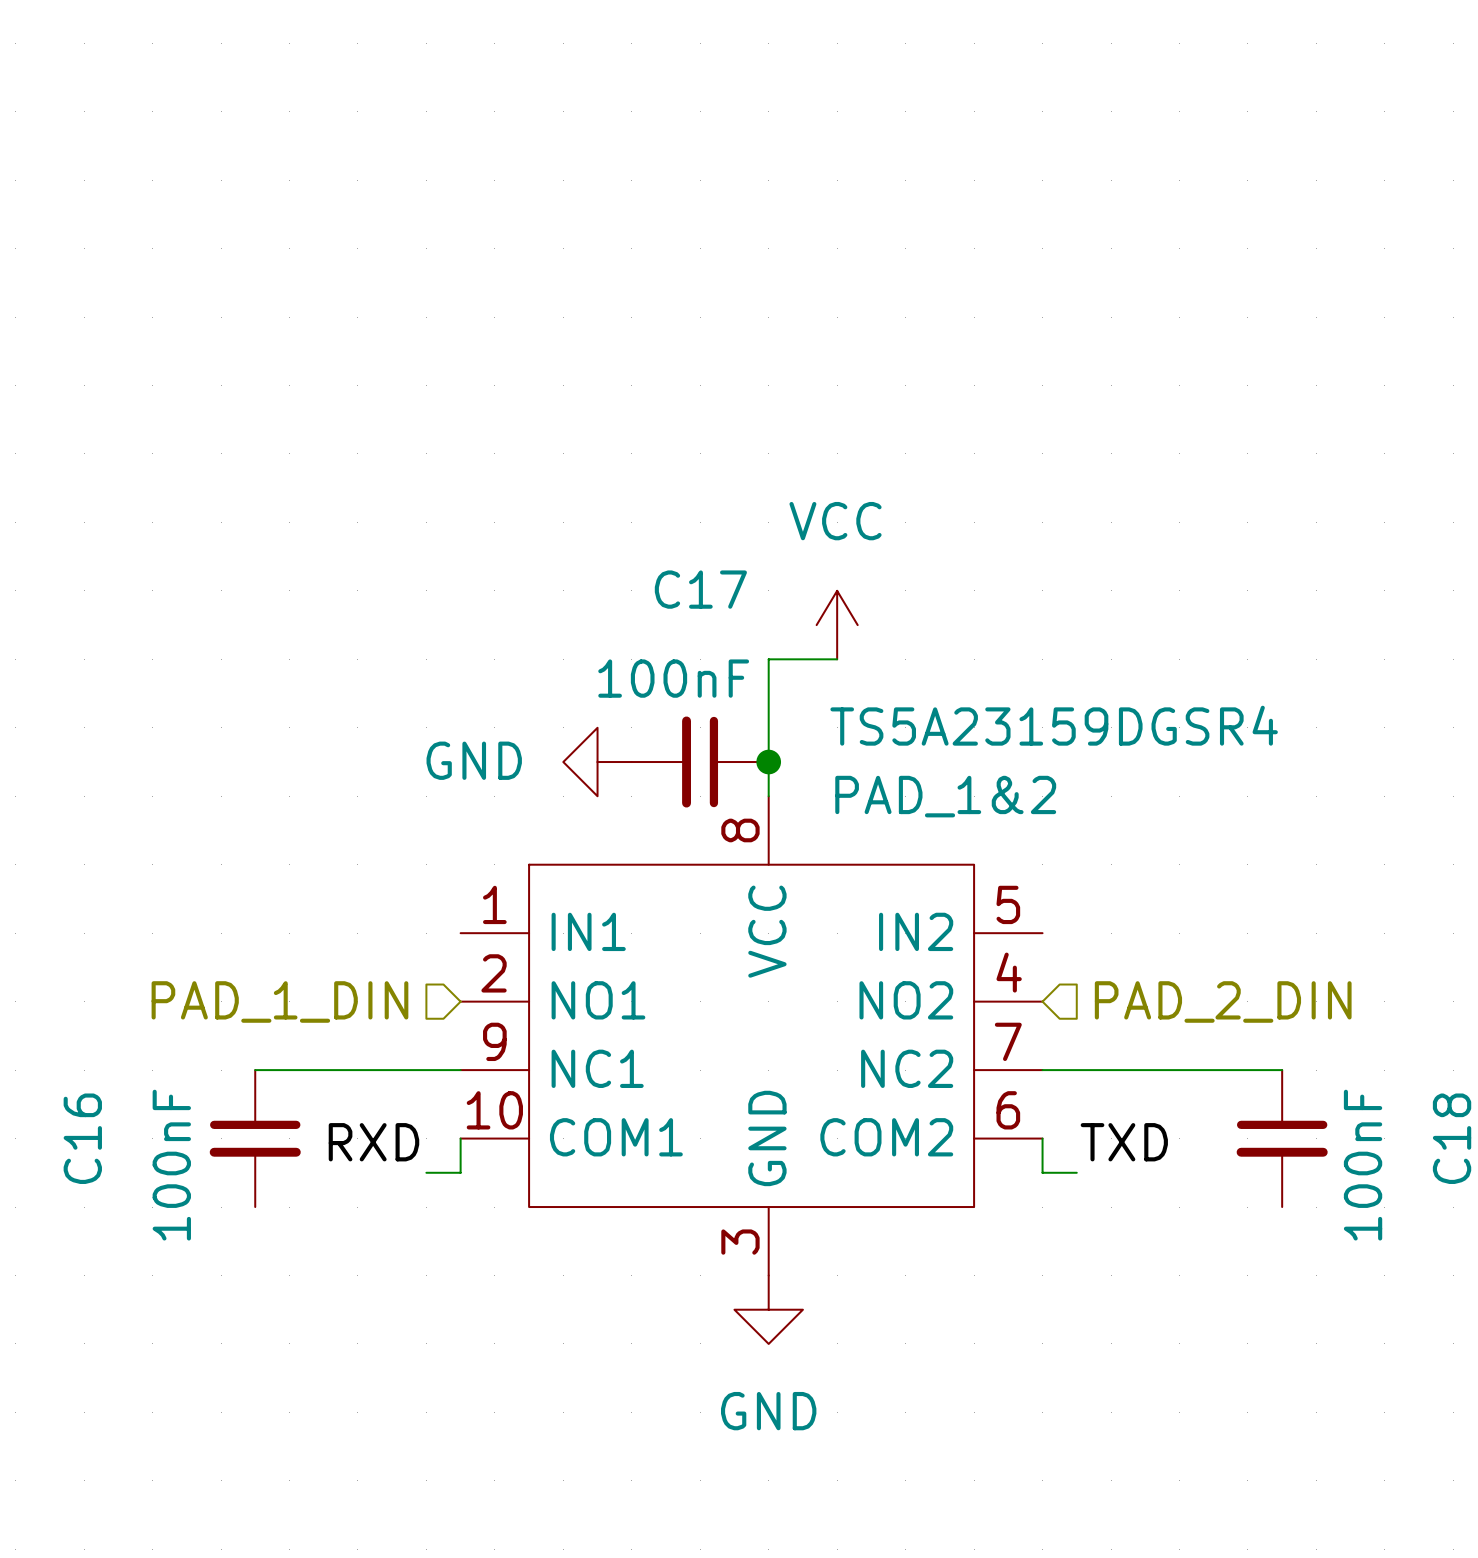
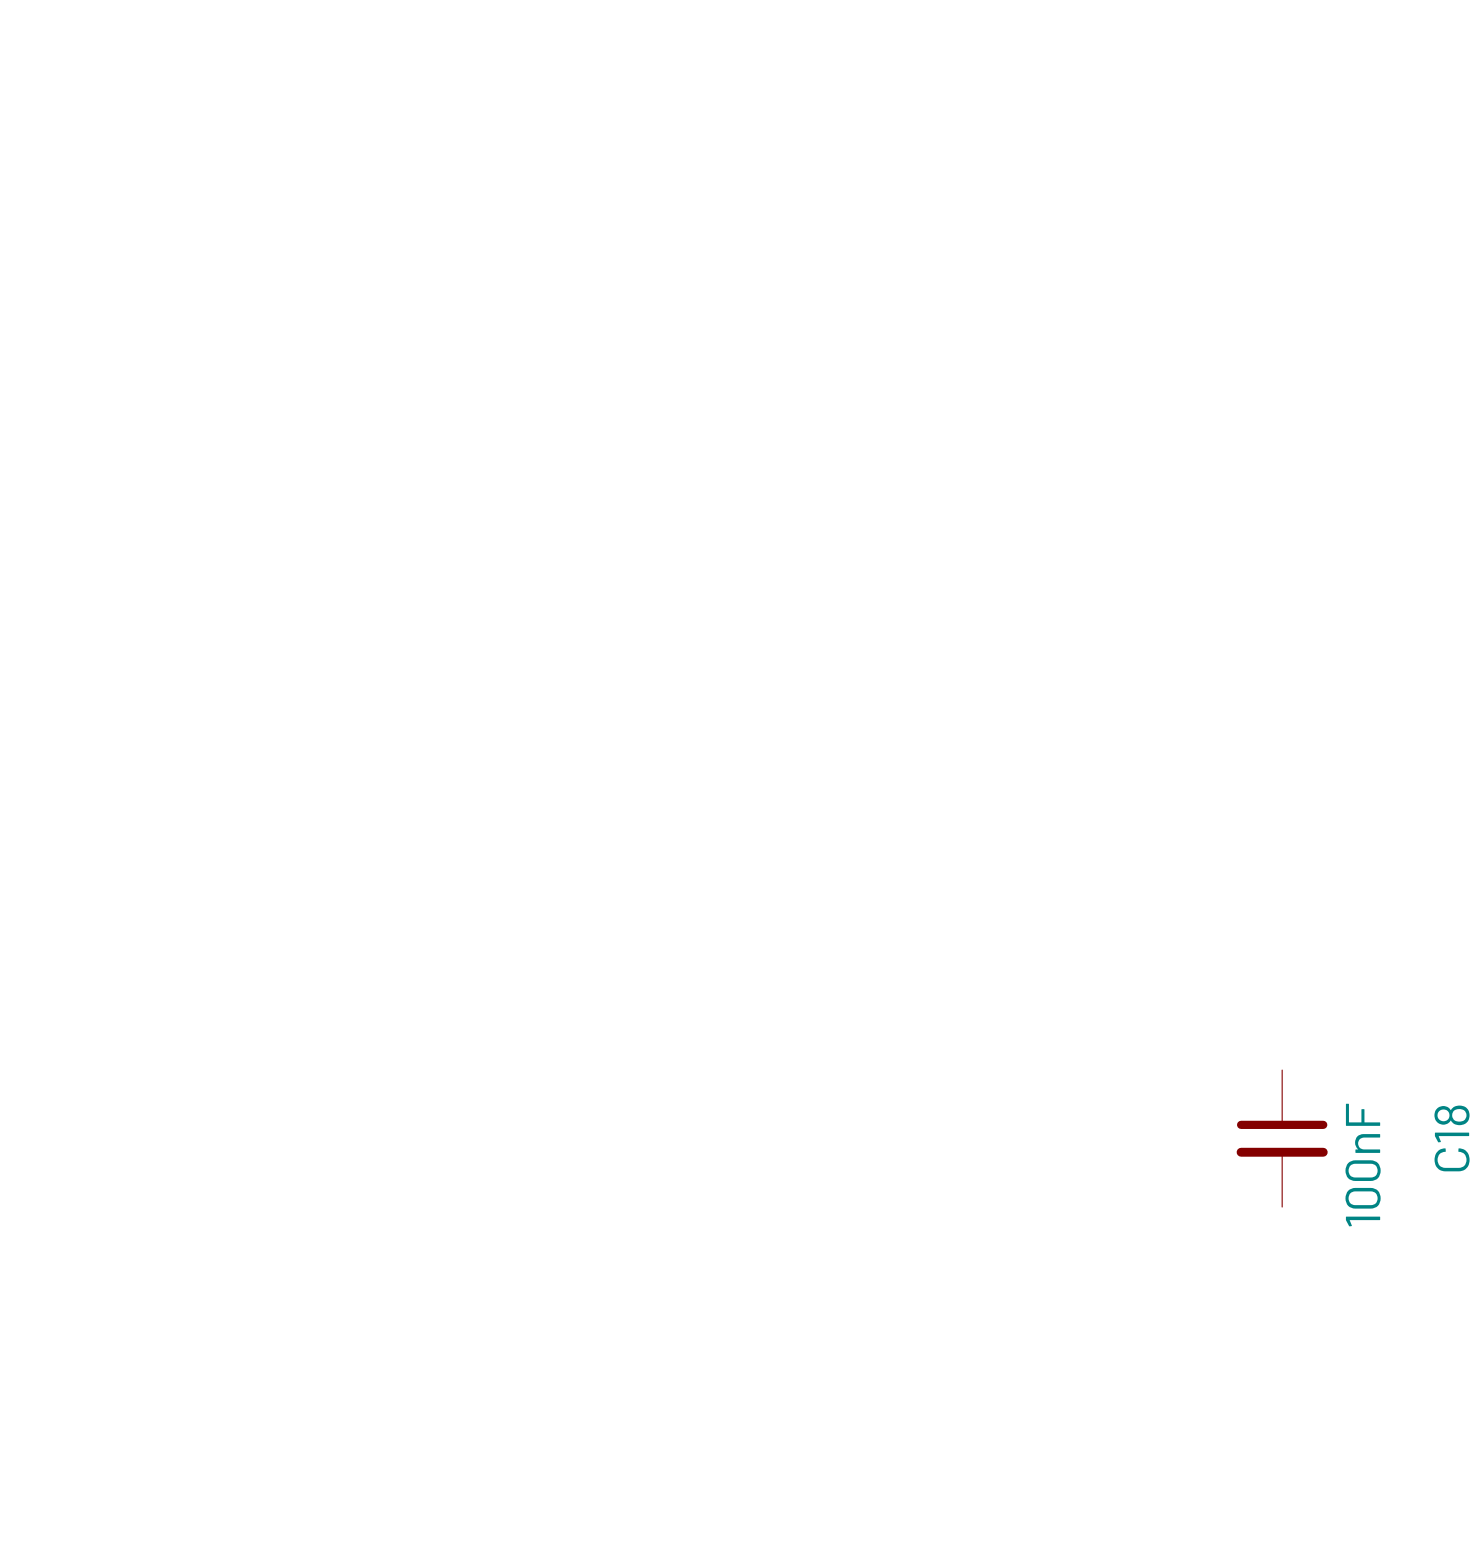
power symbol: VCC (837, 625) -> none
wire: (837, 659) (768, 659) (768, 796) -> none
power symbol: GND (597, 762) -> none
C17: 100nF (700, 762) -> none
junction: (768, 762) -> none
hierarchical label: PAD_1_DIN (279, 1001) -> none
hierarchical label: PAD_2_DIN (1223, 1001) -> none
TS5A23159DGSR4: PAD_1&2 (751, 1035) -> none
wire: (255, 1070) (460, 1070) -> none
wire: (1042, 1070) (1282, 1070) -> none
C16: 100nF (255, 1138) -> none
wire: (460, 1138) (460, 1172) (426, 1172) -> none
wire: (1042, 1138) (1042, 1172) (1076, 1172) -> none
label: RXD (373, 1142) -> none
label: TXD (1124, 1142) -> none
power symbol: GND (768, 1309) -> none

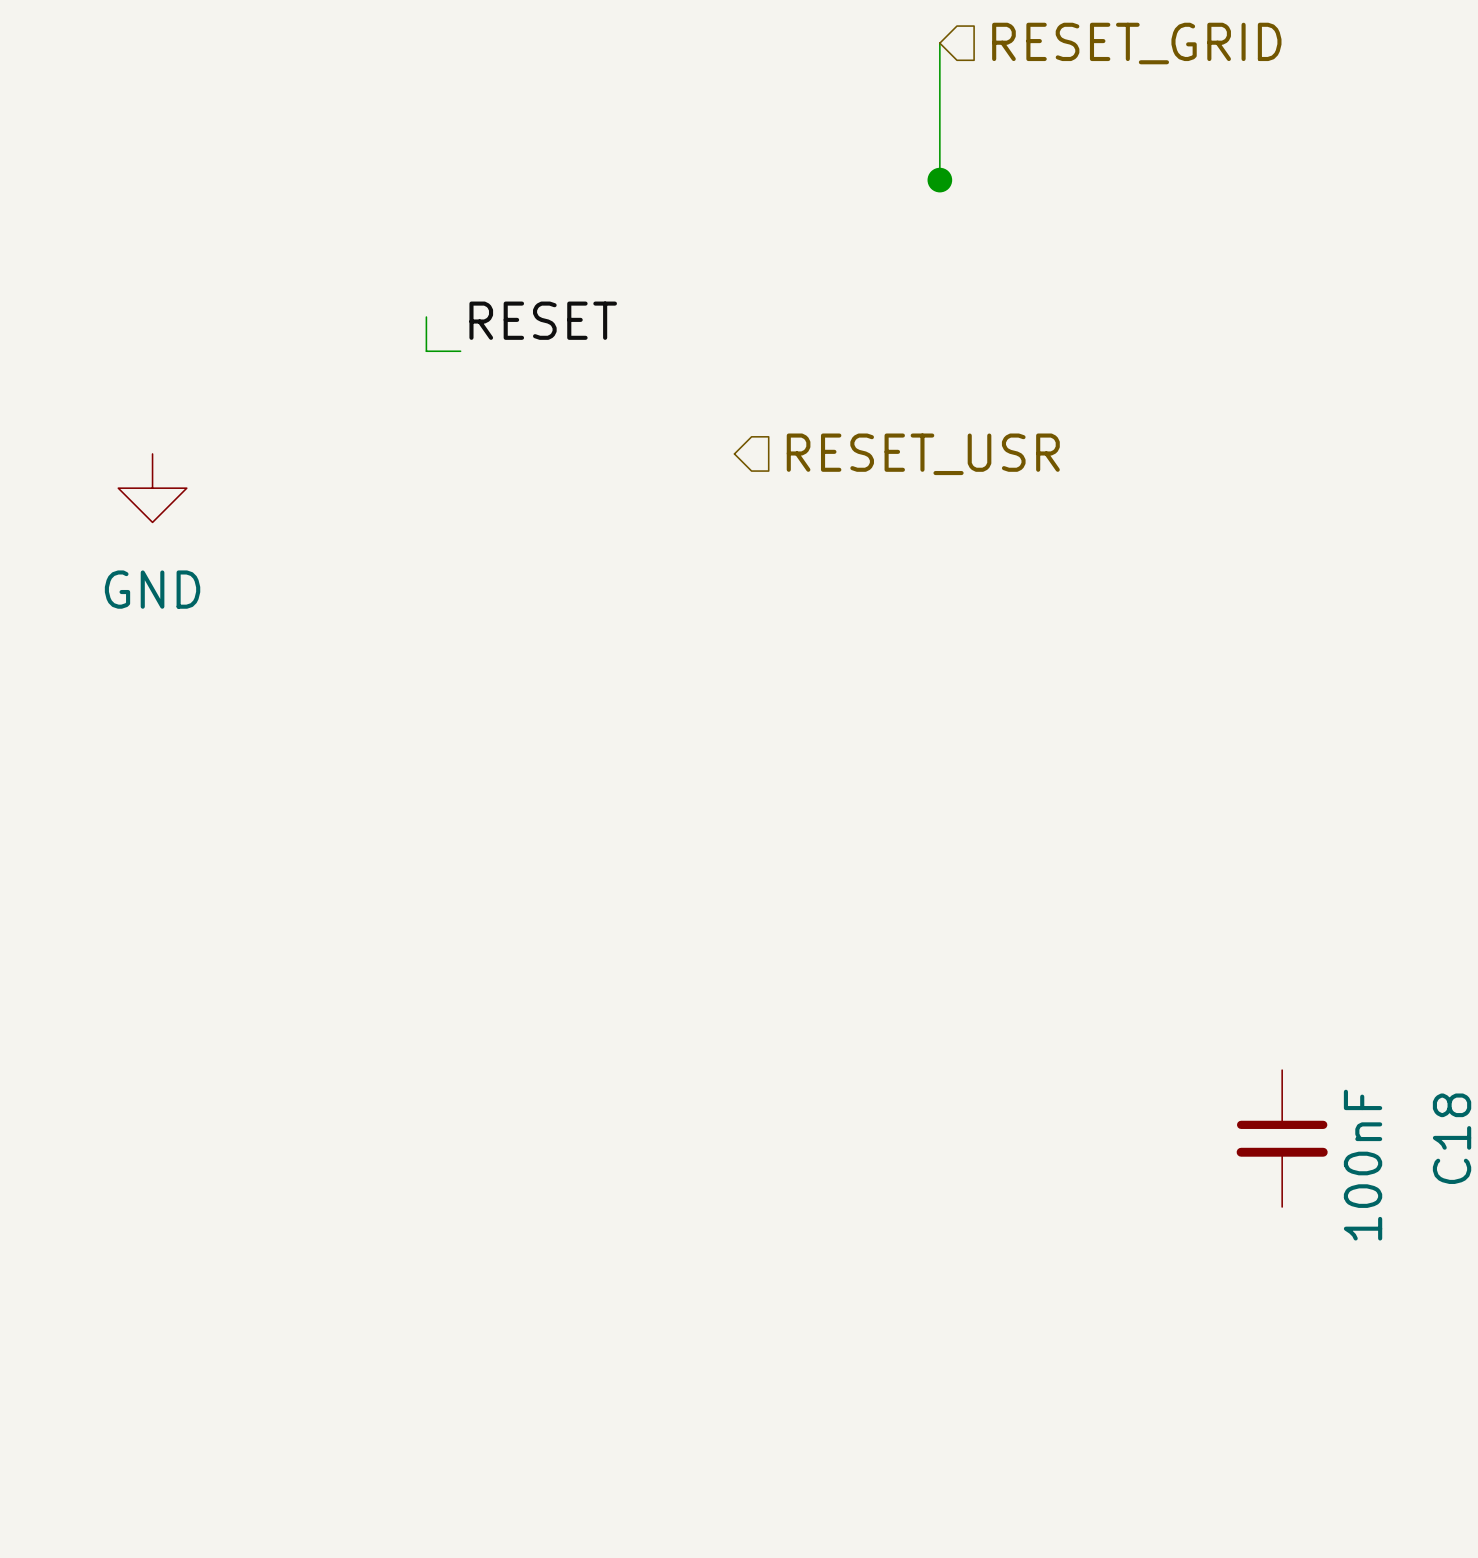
hierarchical label: none -> RESET_GRID (1136, 43)
wire: none -> (939, 43) (939, 180)
junction: none -> (939, 180)
wire: none -> (426, 317) (426, 351) (460, 351)
label: none -> RESET (543, 320)
hierarchical label: none -> RESET_USR (923, 454)
power symbol: none -> GND (152, 488)

